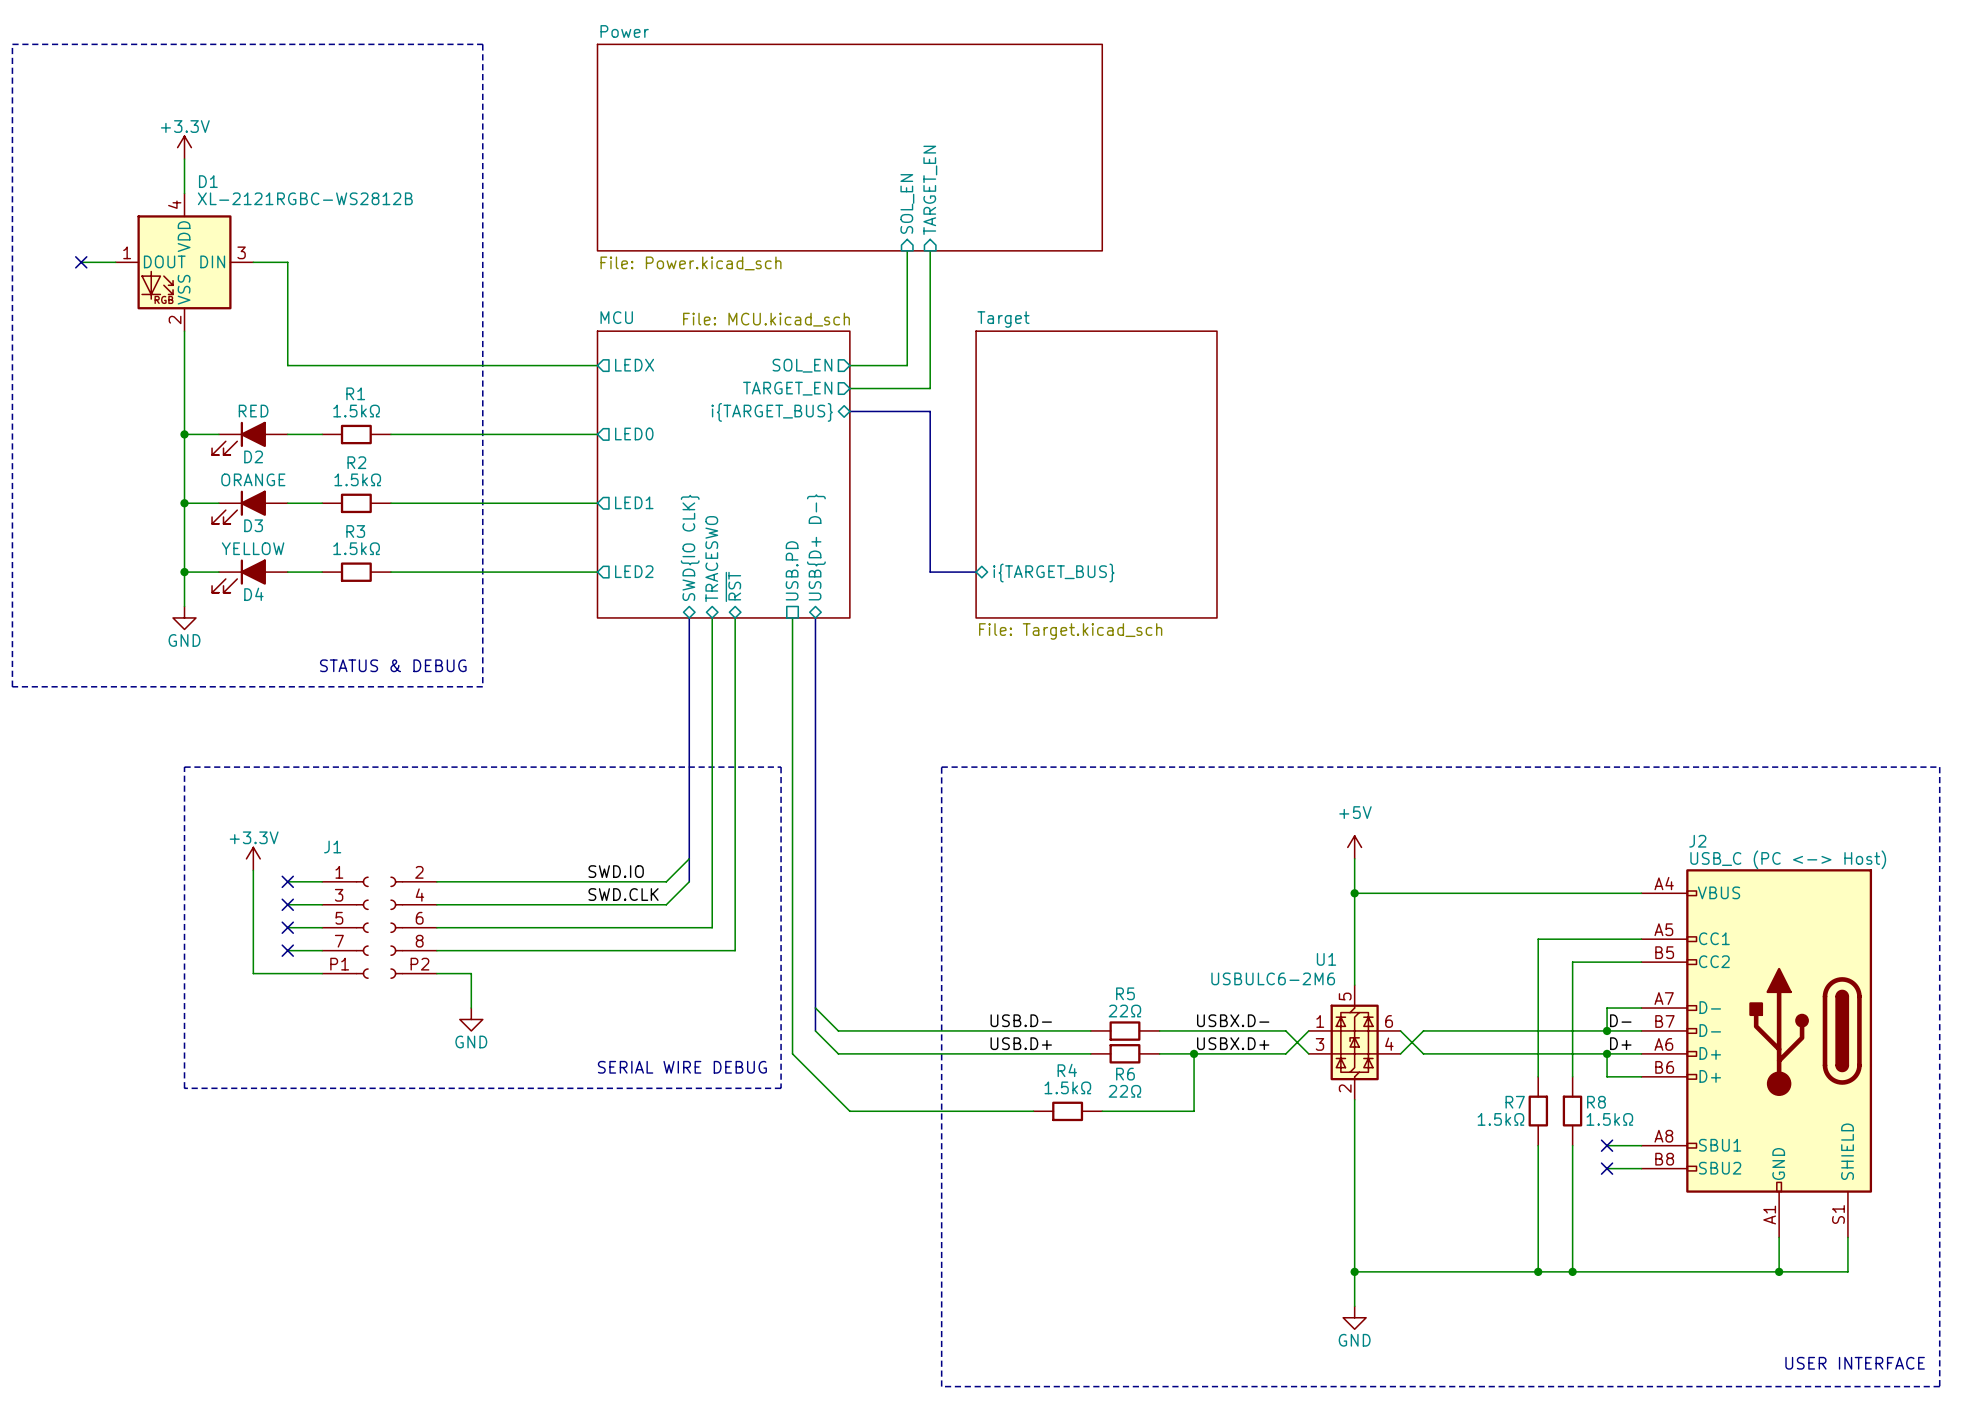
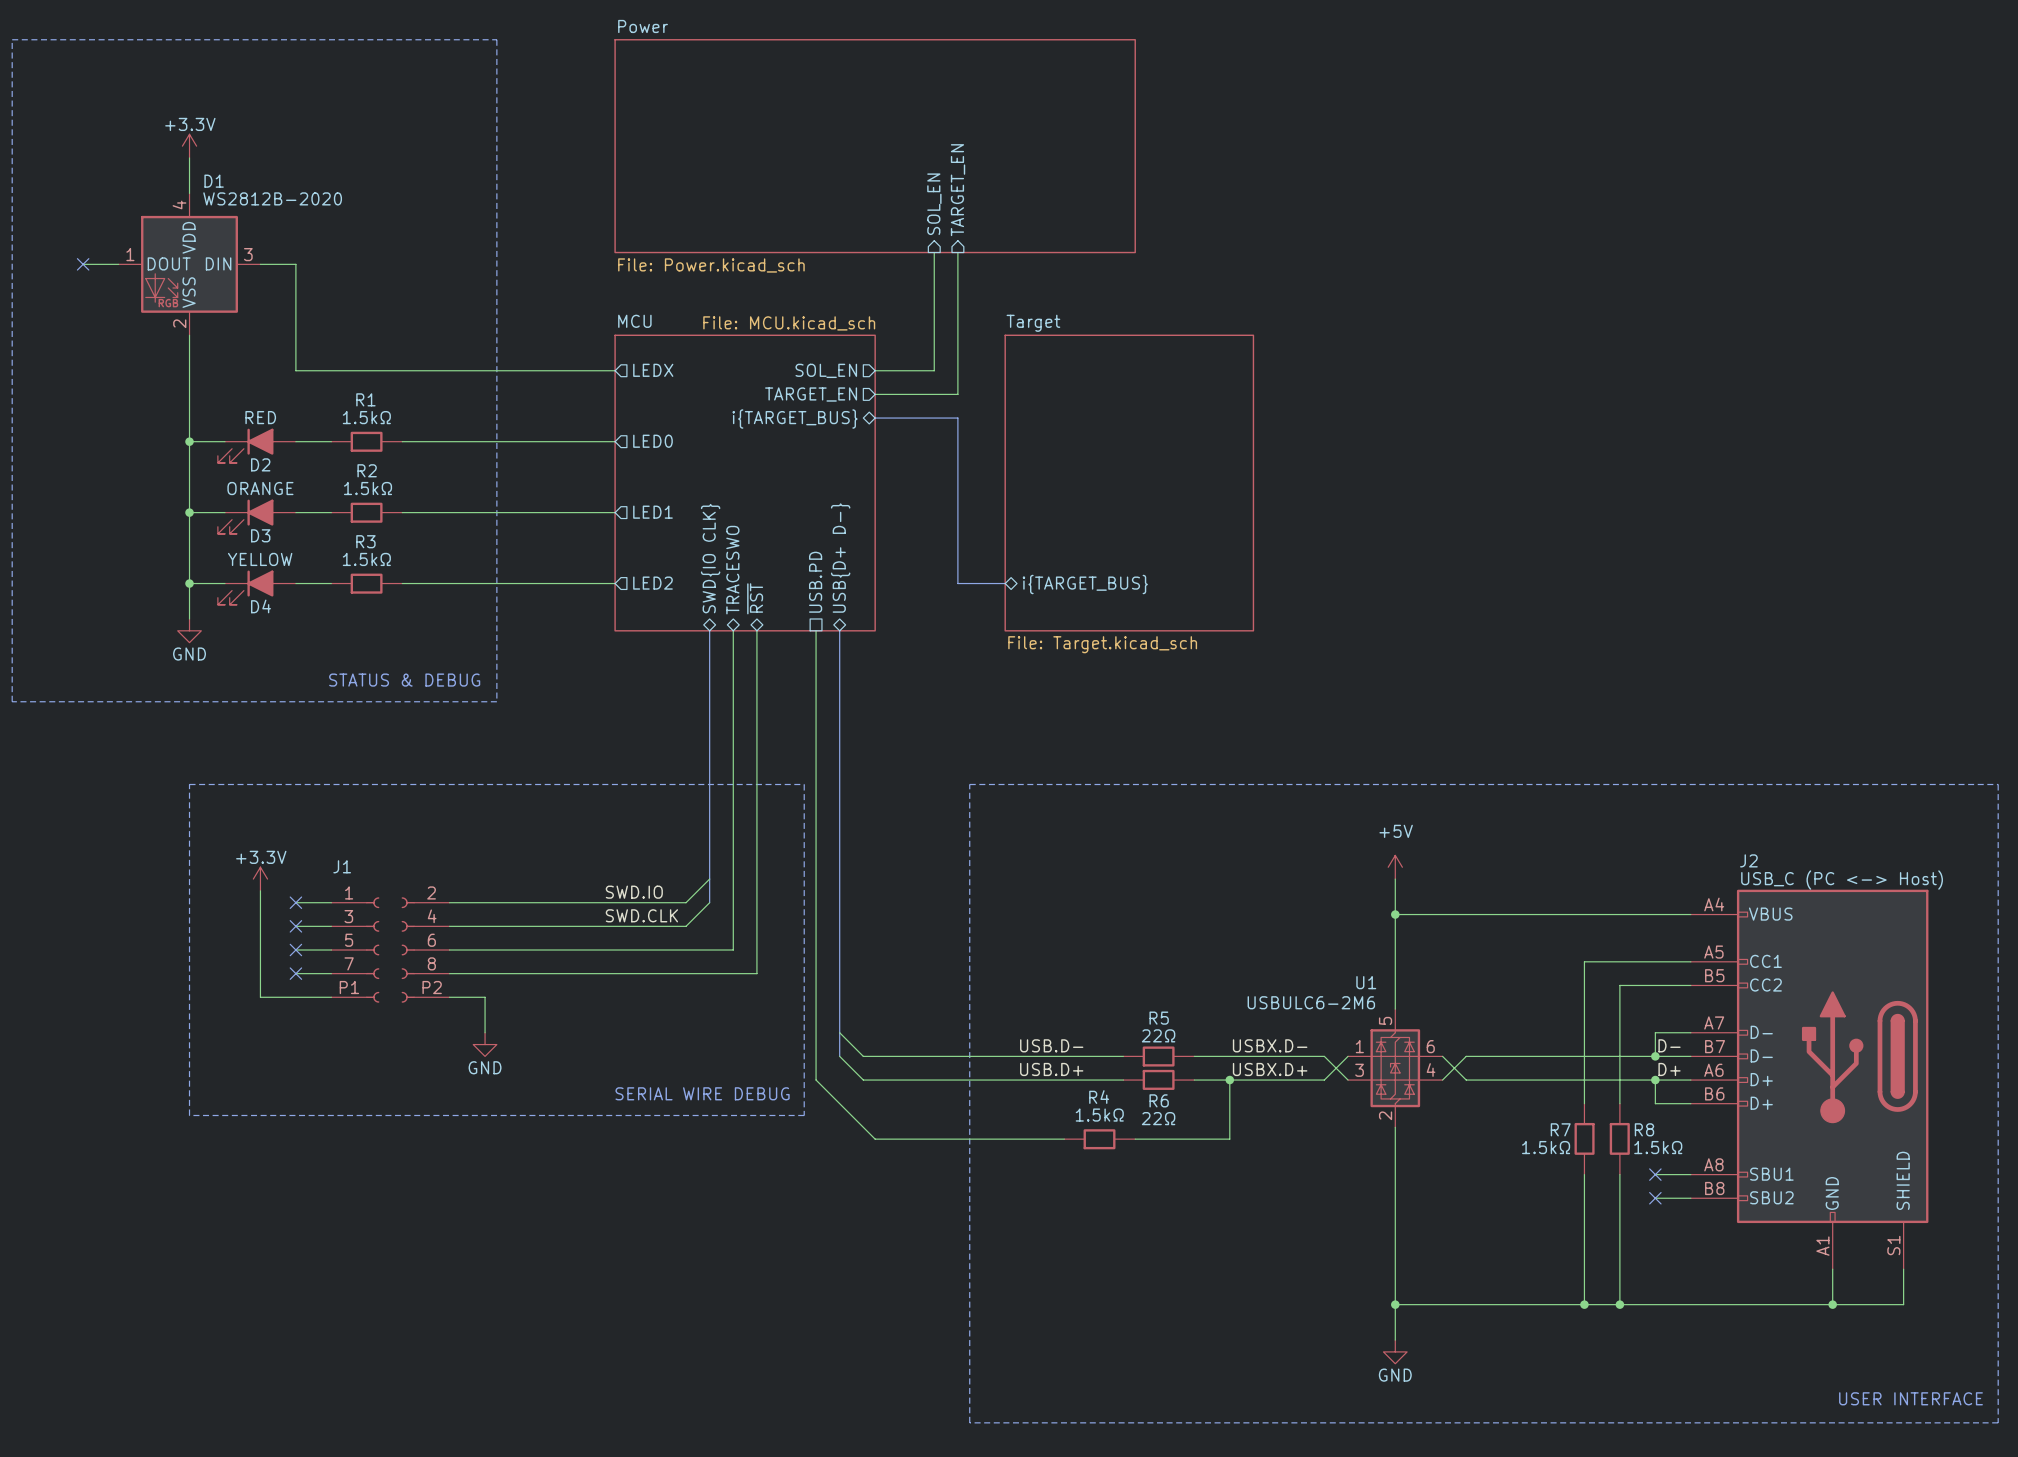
D1 value: XL-2121RGBC-WS2812B (305, 198) -> WS2812B-2020 (272, 198)

